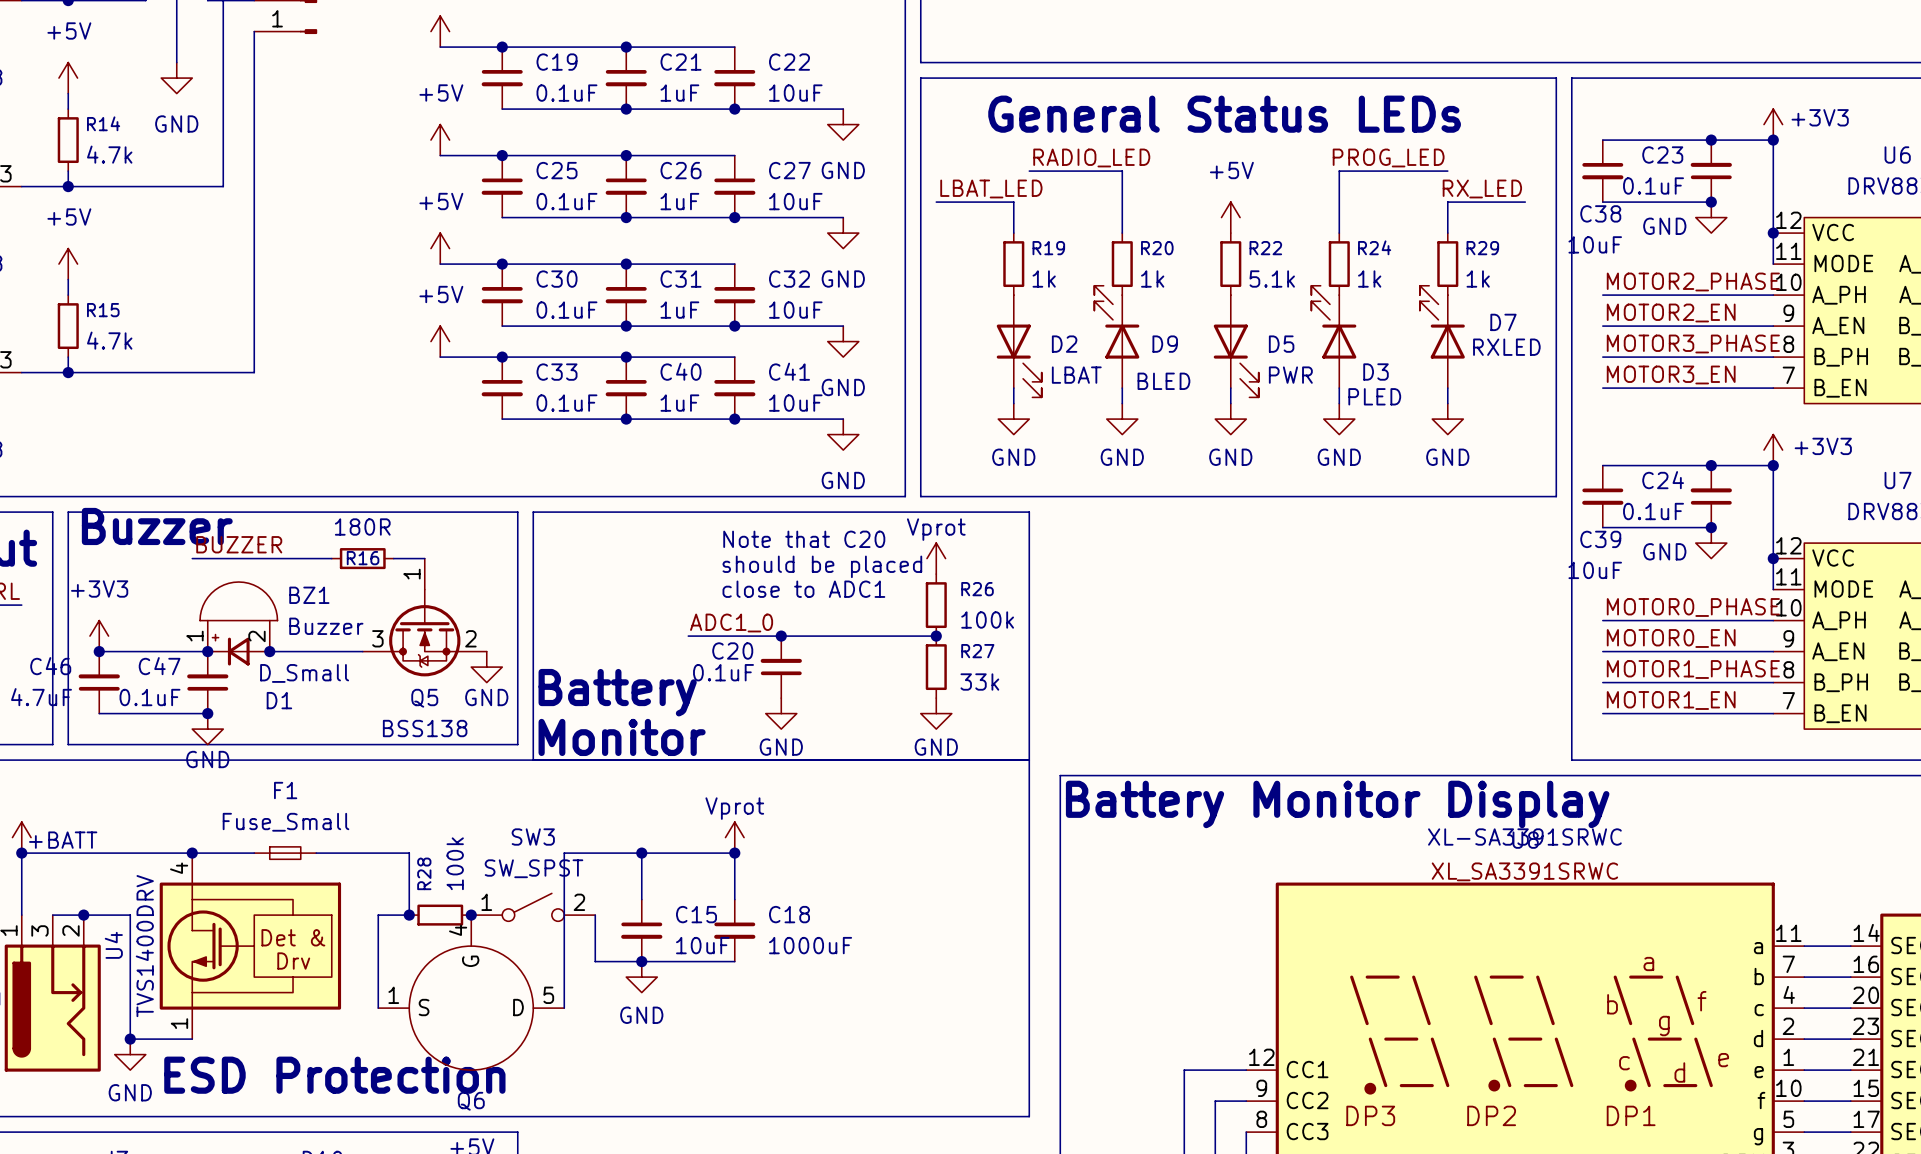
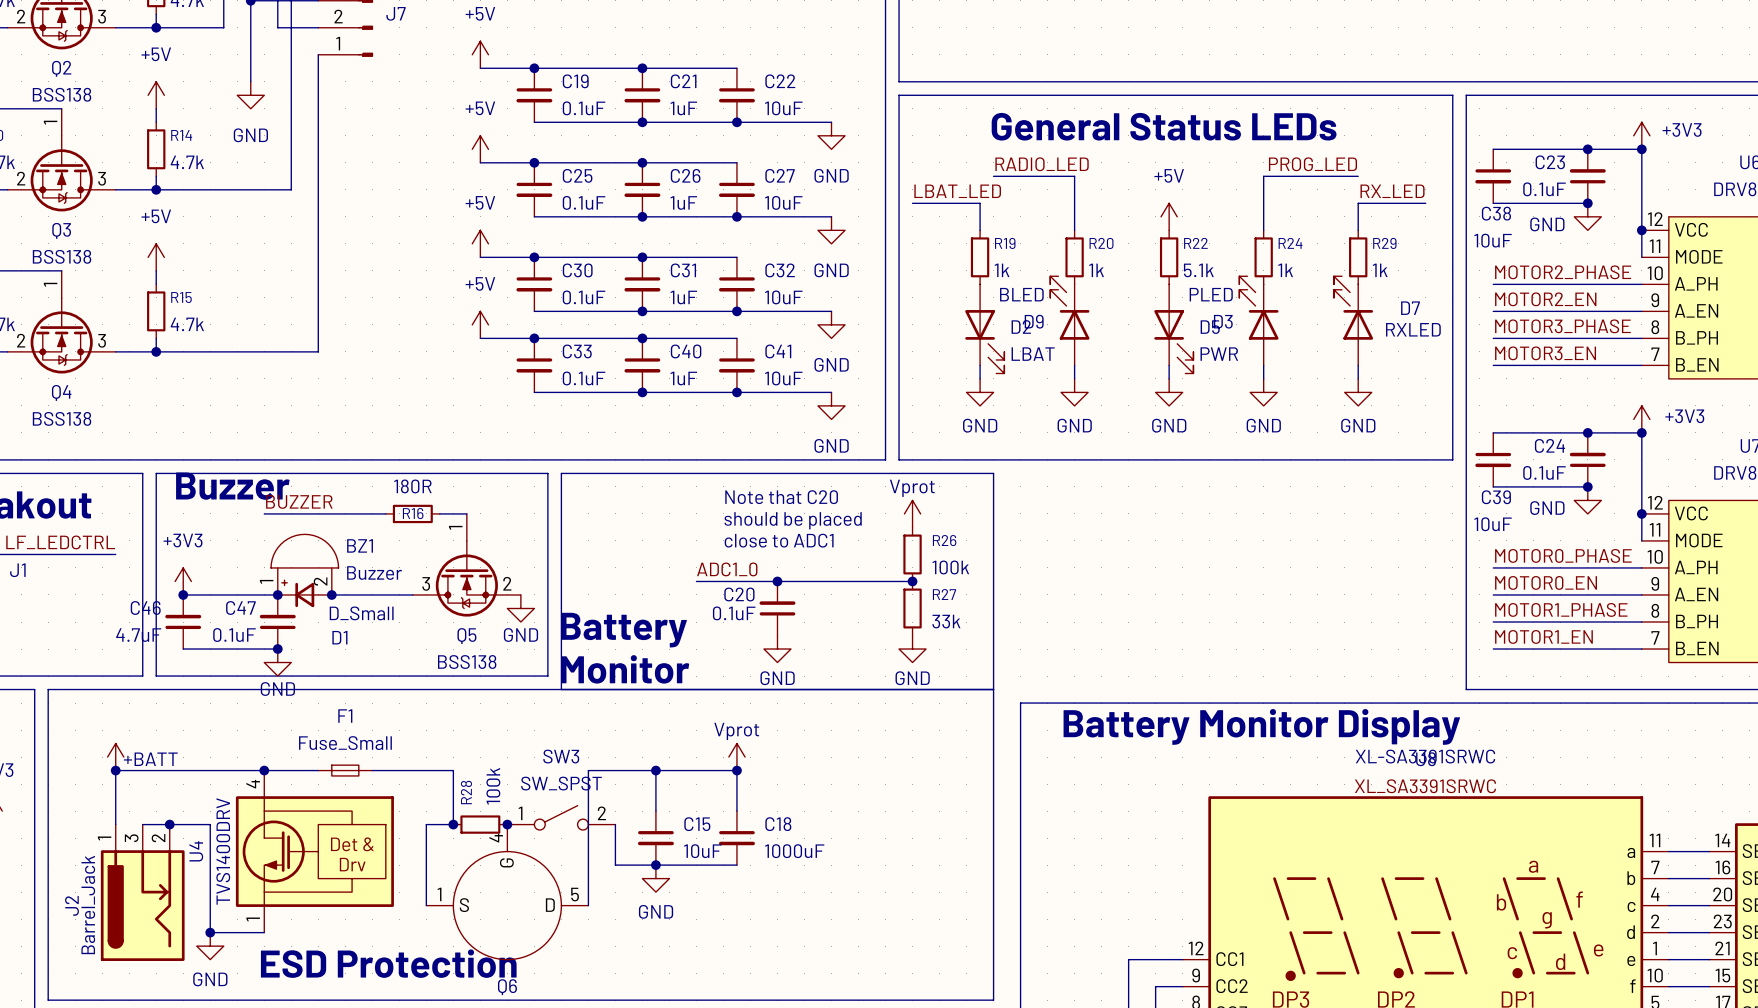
D9 name position: D9 (1165, 344) -> D9 (1034, 321)
D3 name position: D3 (1376, 372) -> D3 (1223, 321)
D9 value position: BLED (1163, 381) -> BLED (1021, 294)
D3 value position: PLED (1374, 396) -> PLED (1211, 294)

